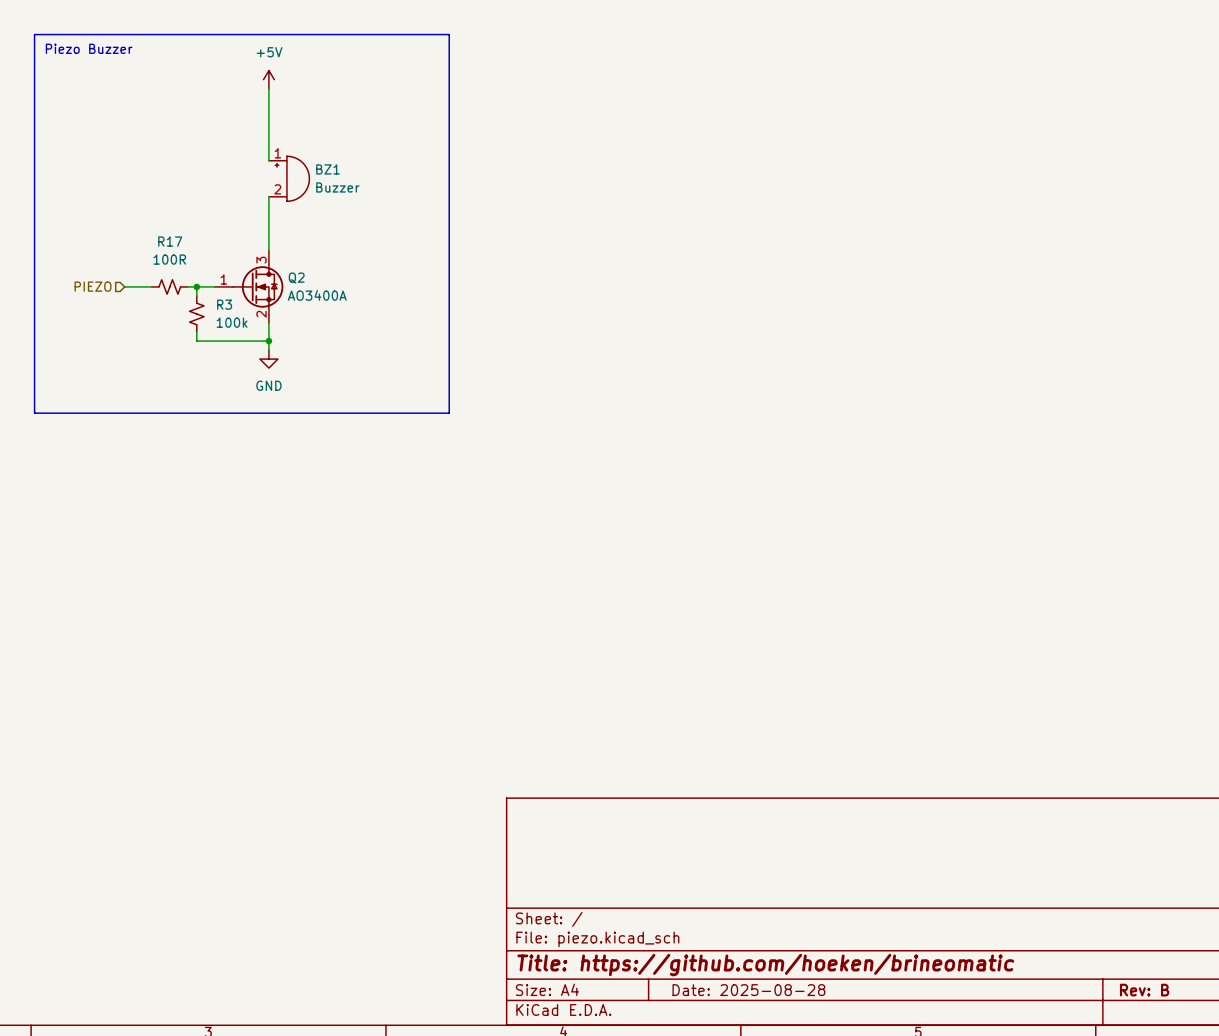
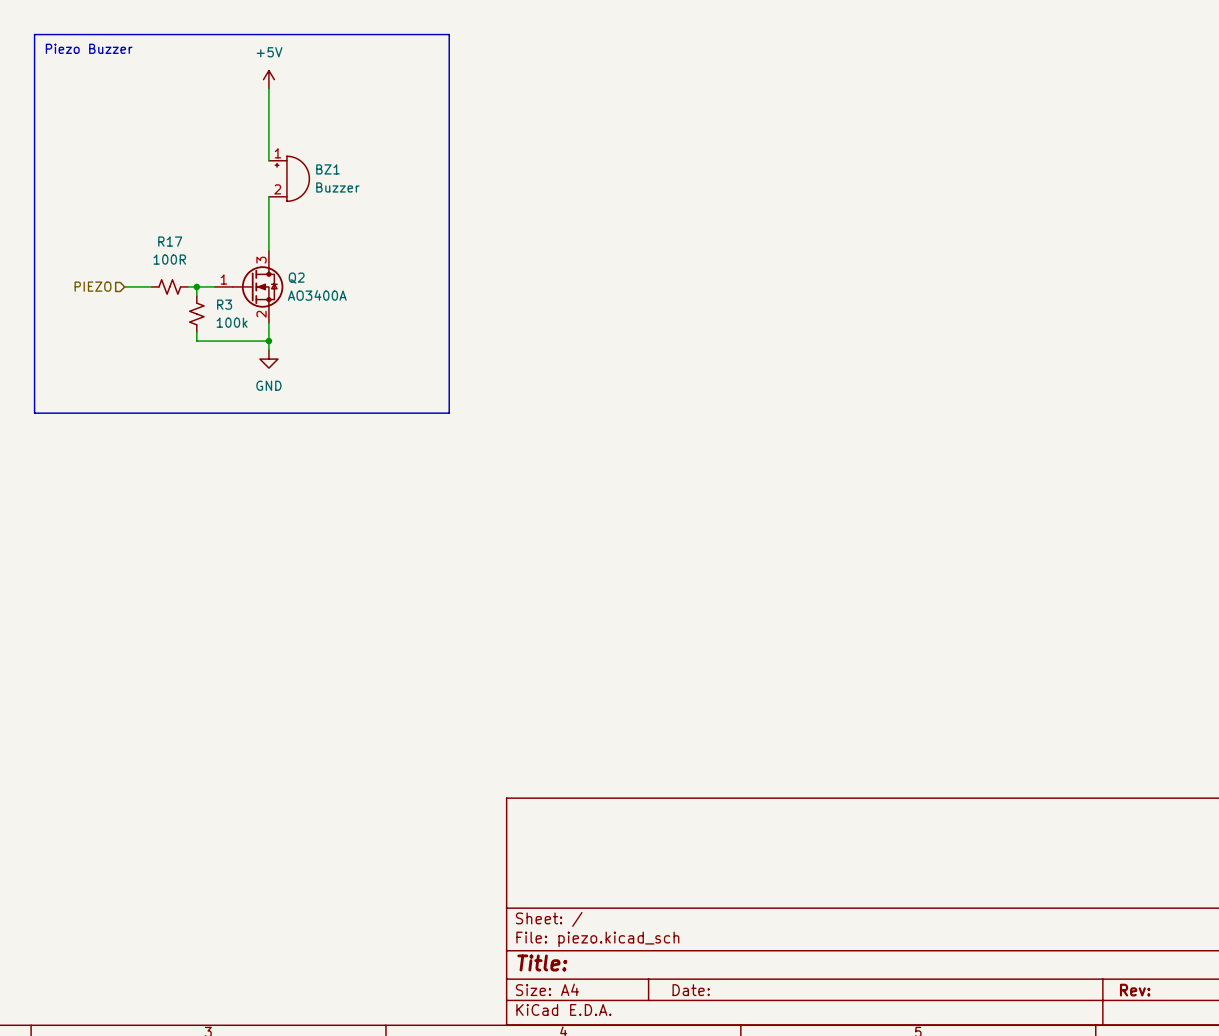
title block: Title: https://github.com/hoeken/brineomatic (765, 965) -> Title: (542, 962)
title block: Date: 2025-08-28 (748, 990) -> Date: (691, 990)
title block: Rev: B (1144, 990) -> Rev: (1135, 990)

